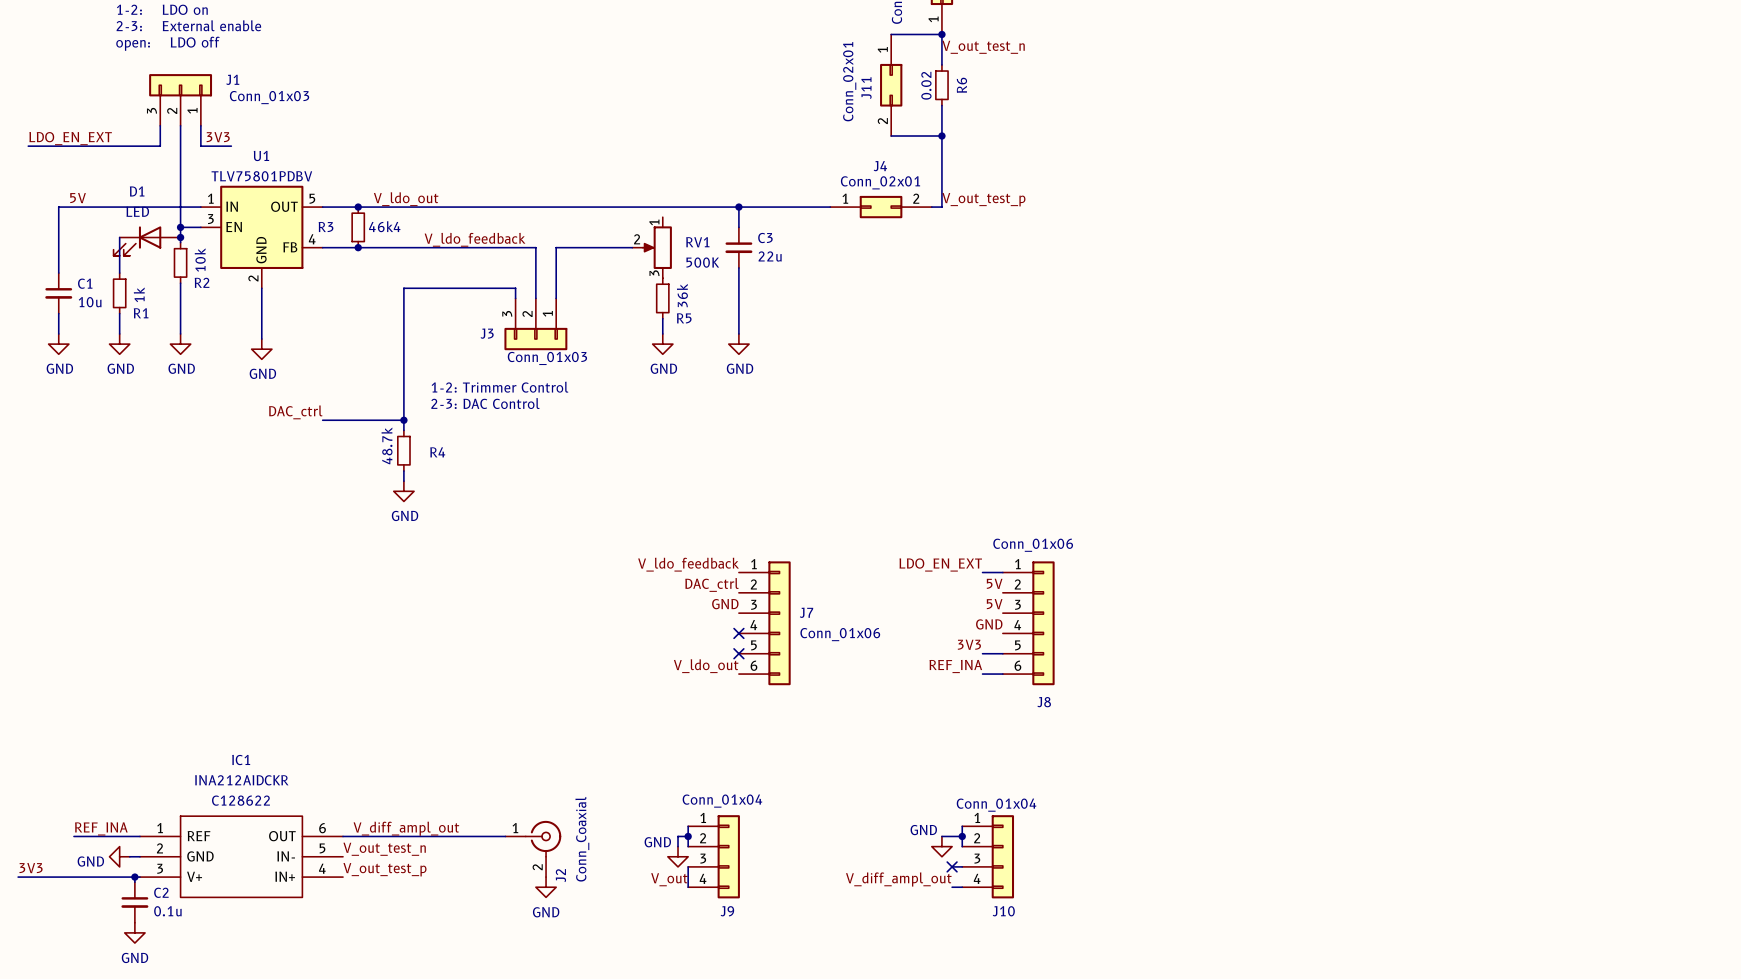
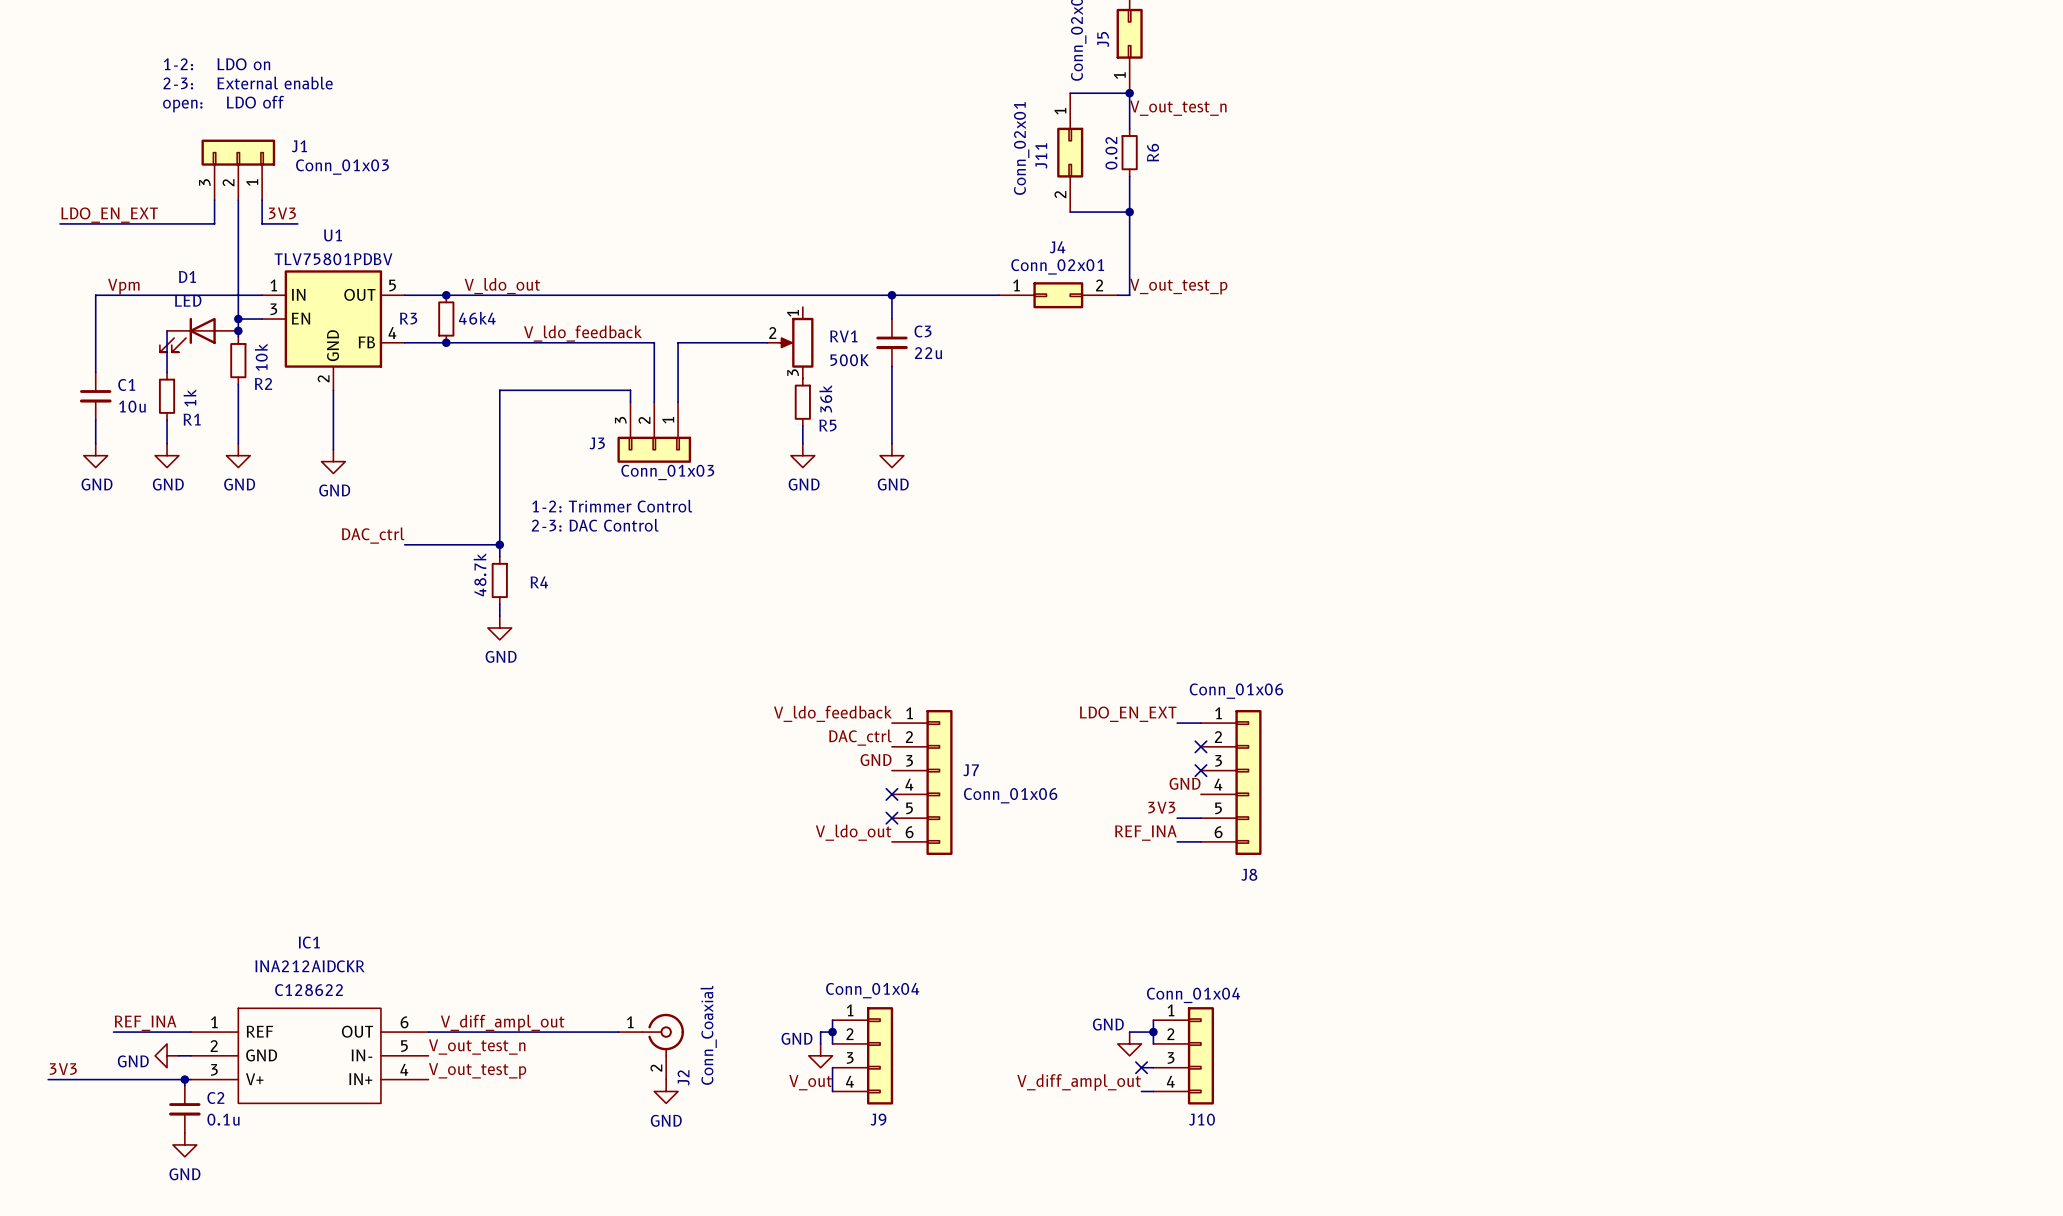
label: 5V (78, 198) -> Vpm (123, 286)
label: 5V (994, 583) -> none
no-connect mark: none -> (1200, 746)
label: 5V (994, 604) -> none
no-connect mark: none -> (1200, 770)

